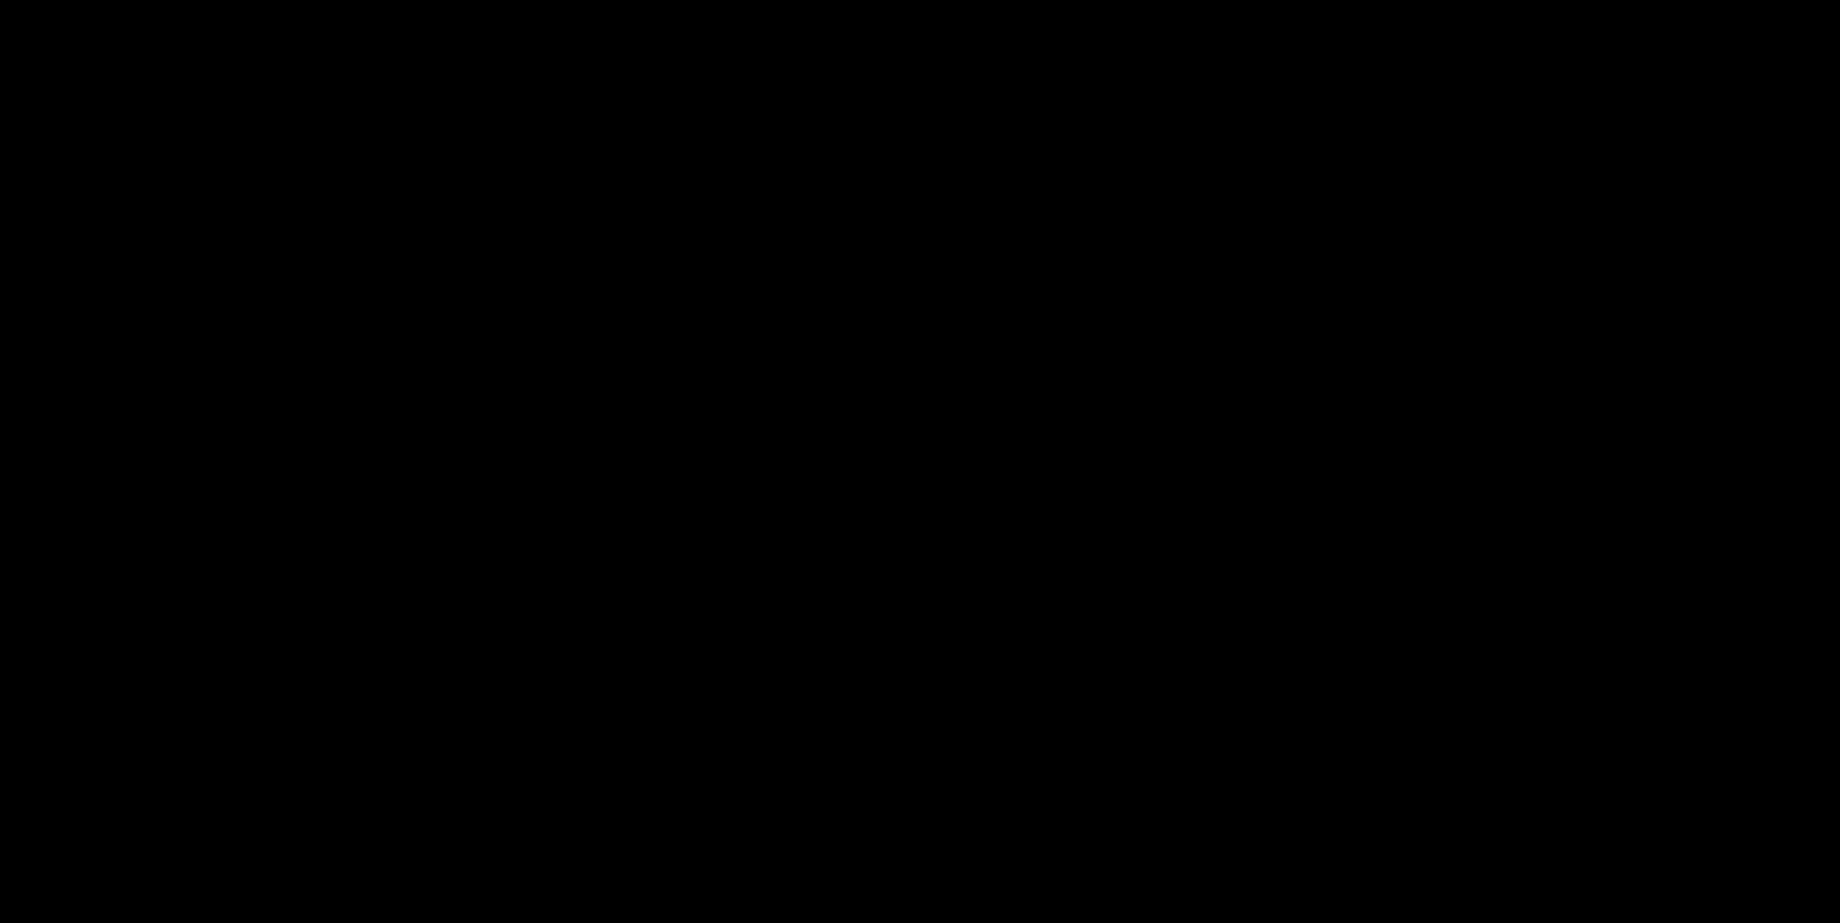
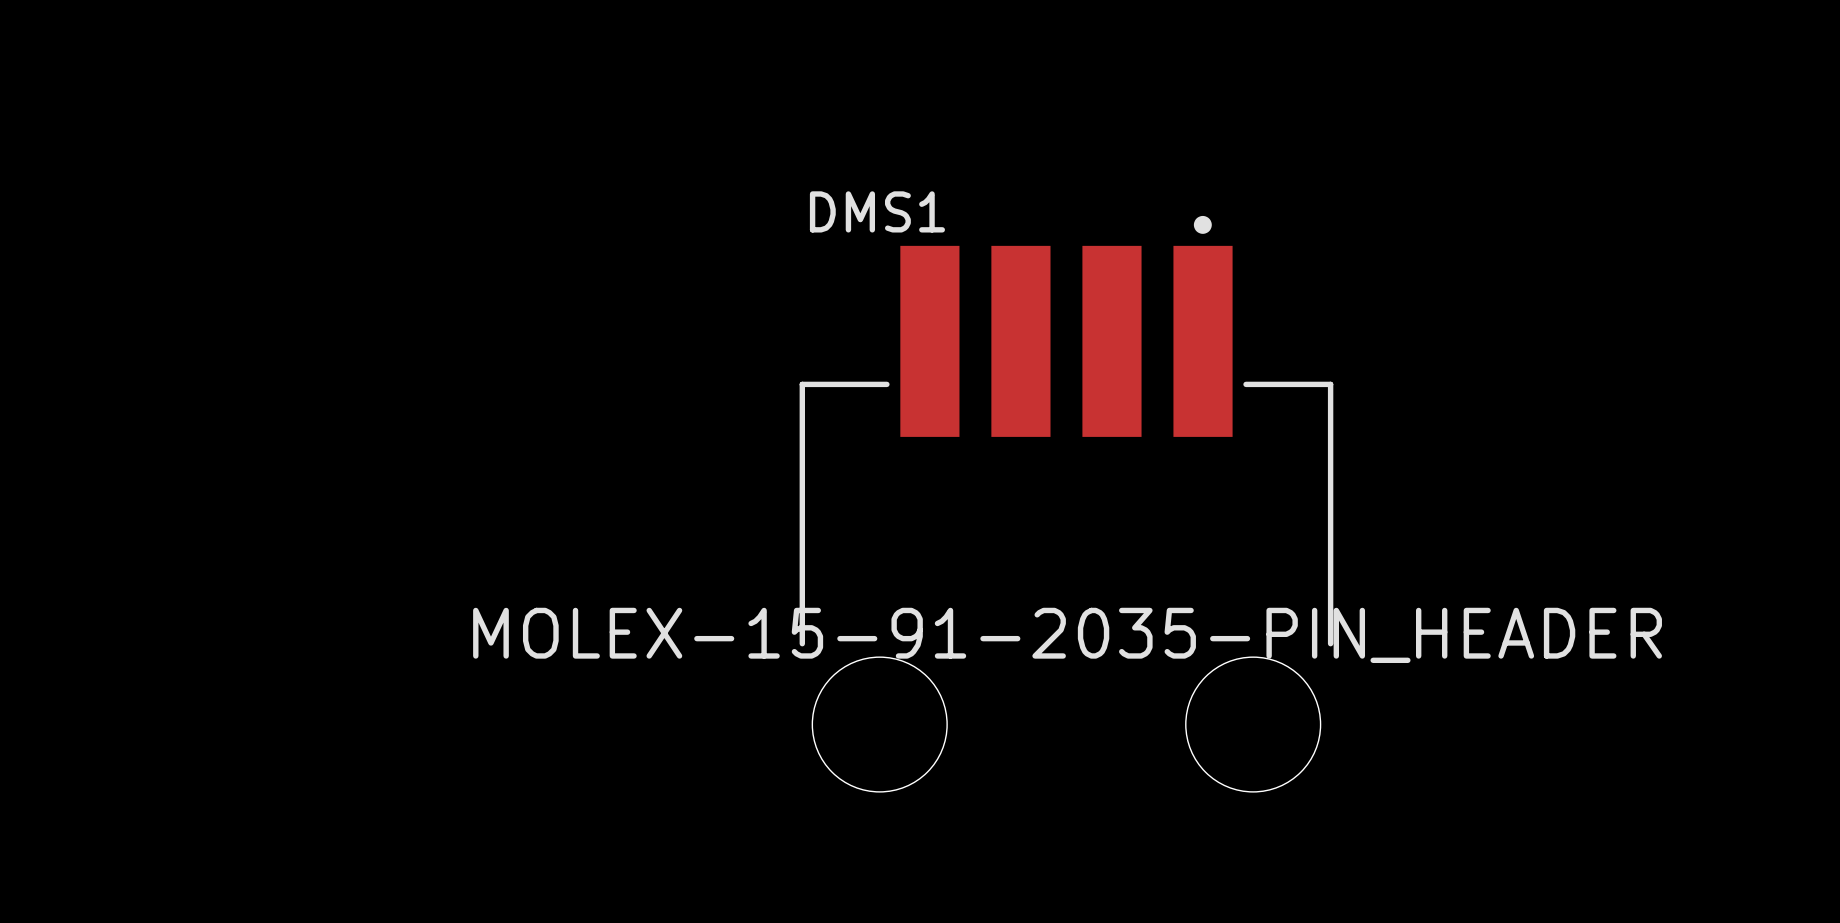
DMS1: none -> MOLEX-15-91-2035-PIN_HEADER (1066, 503)

